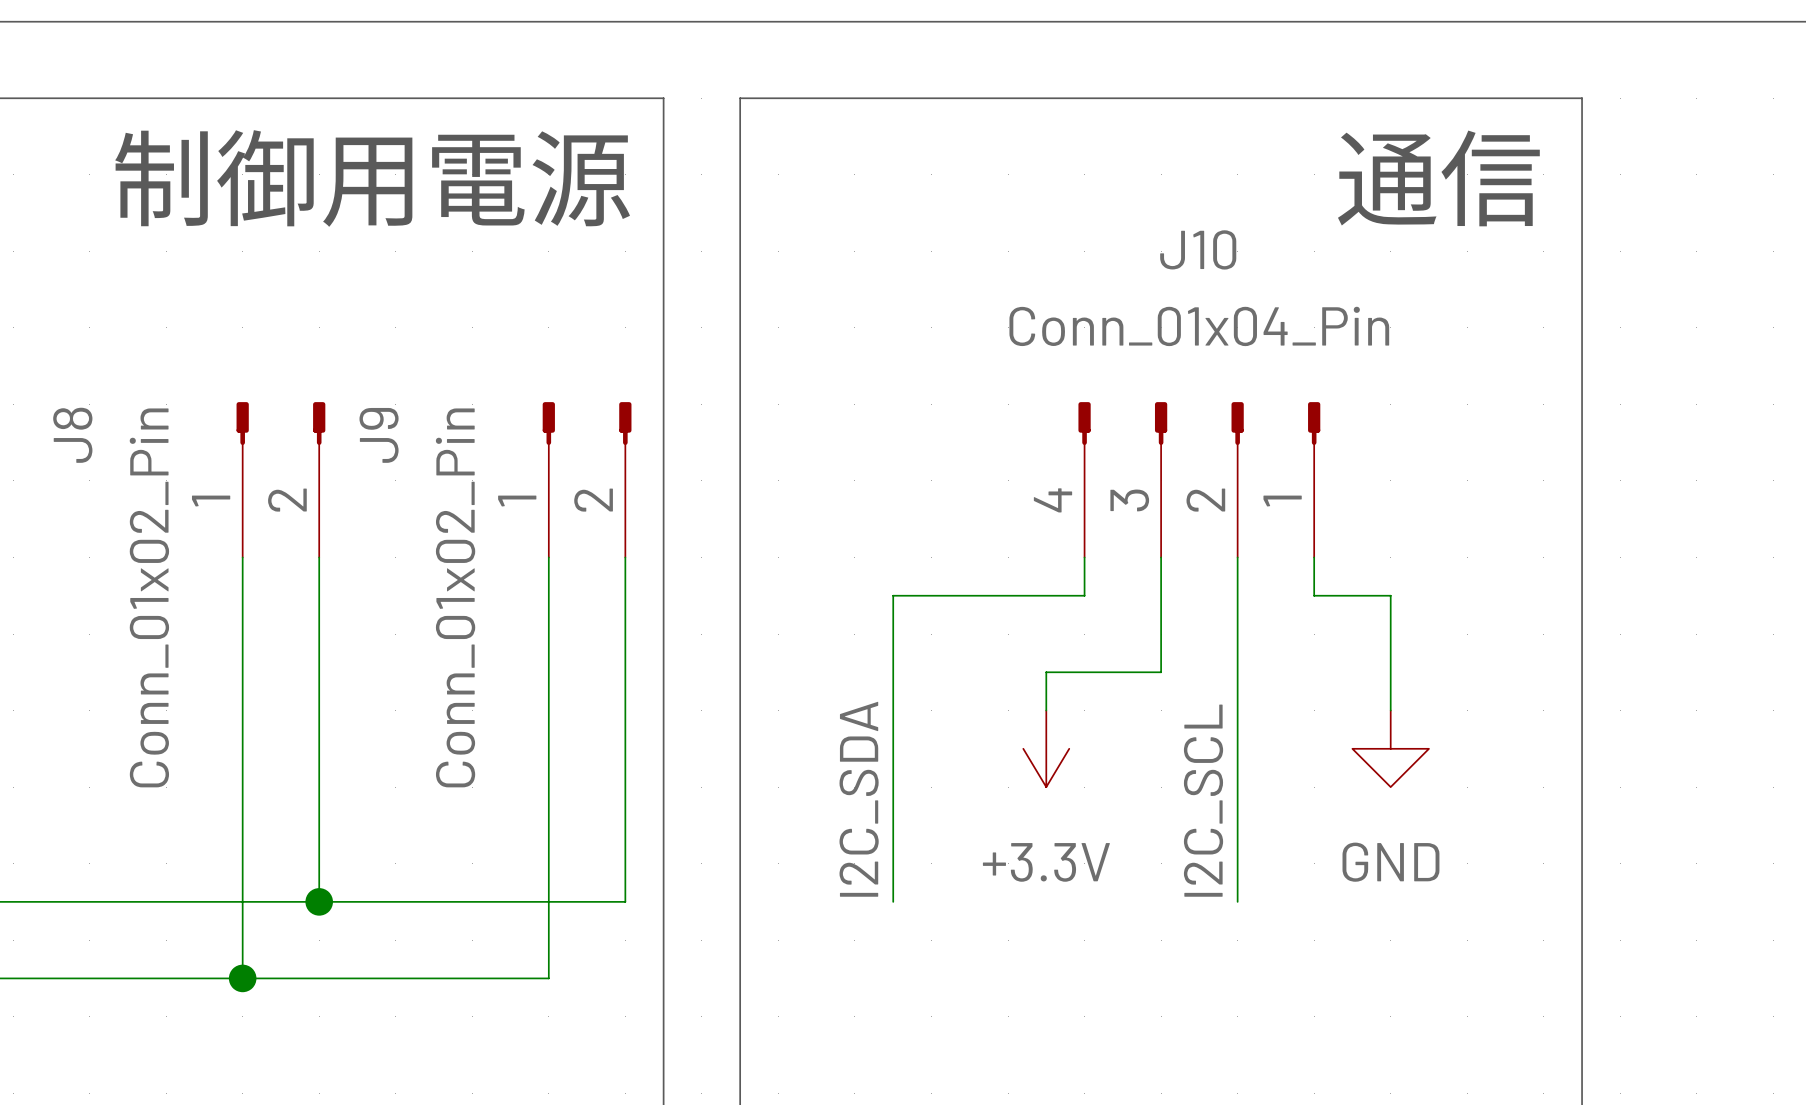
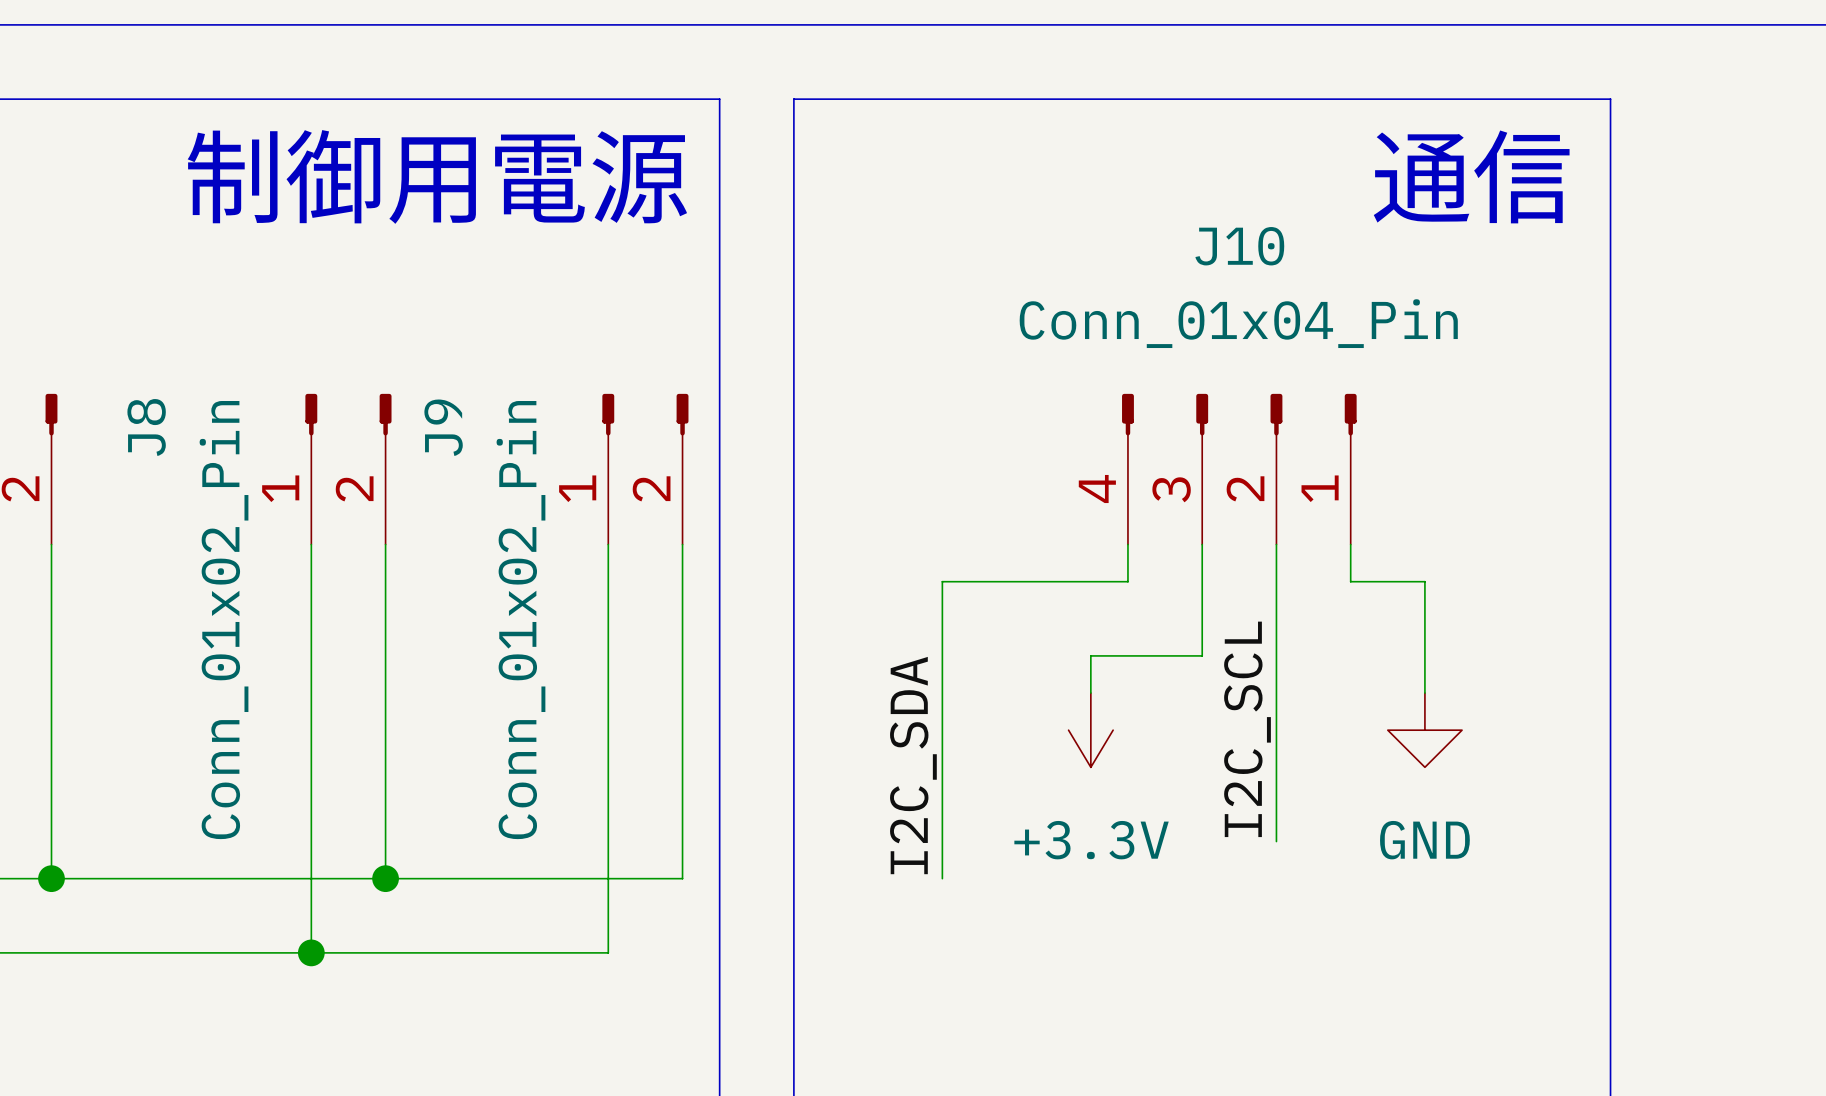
label position: I2C_SCL (1203, 800) -> I2C_SCL (1247, 729)
wire: (1237, 863) (1237, 901) -> none

